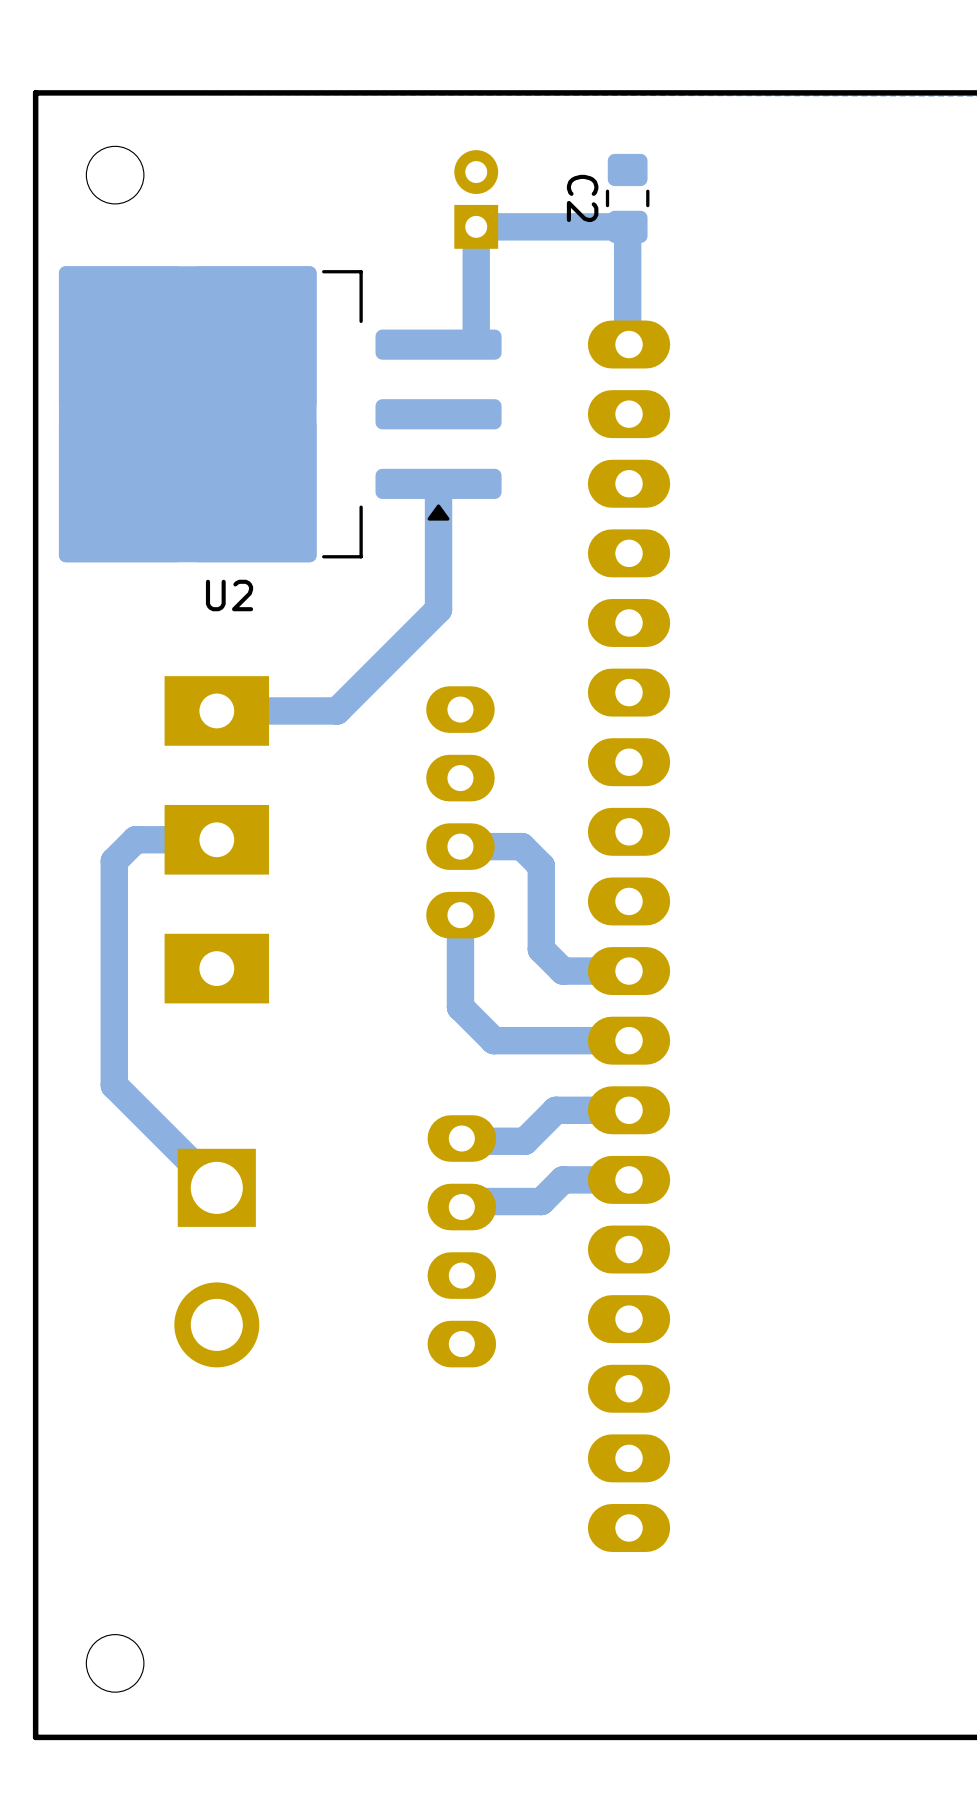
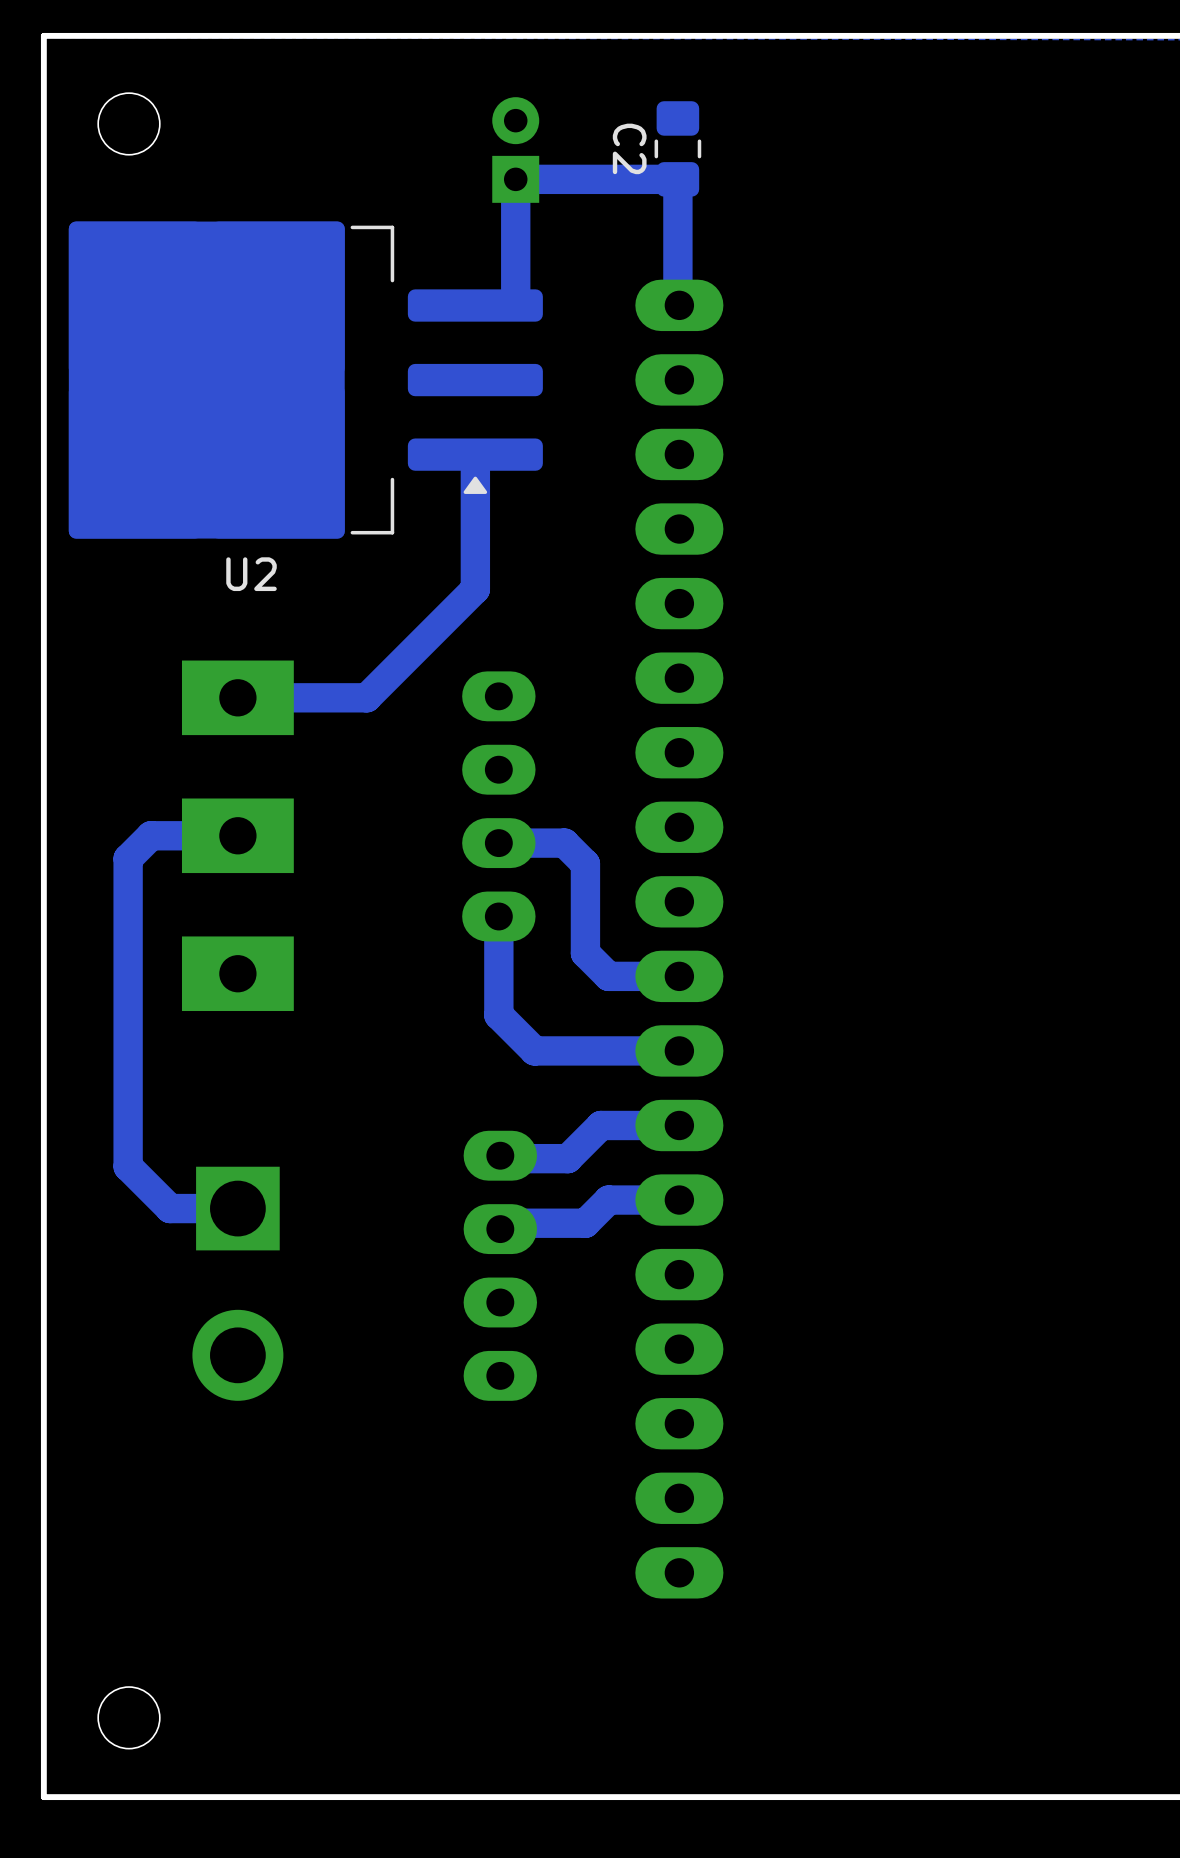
bottom track: (114, 1085) (216, 1187) -> (128, 1098) (128, 1166) (170, 1208) (237, 1208)

